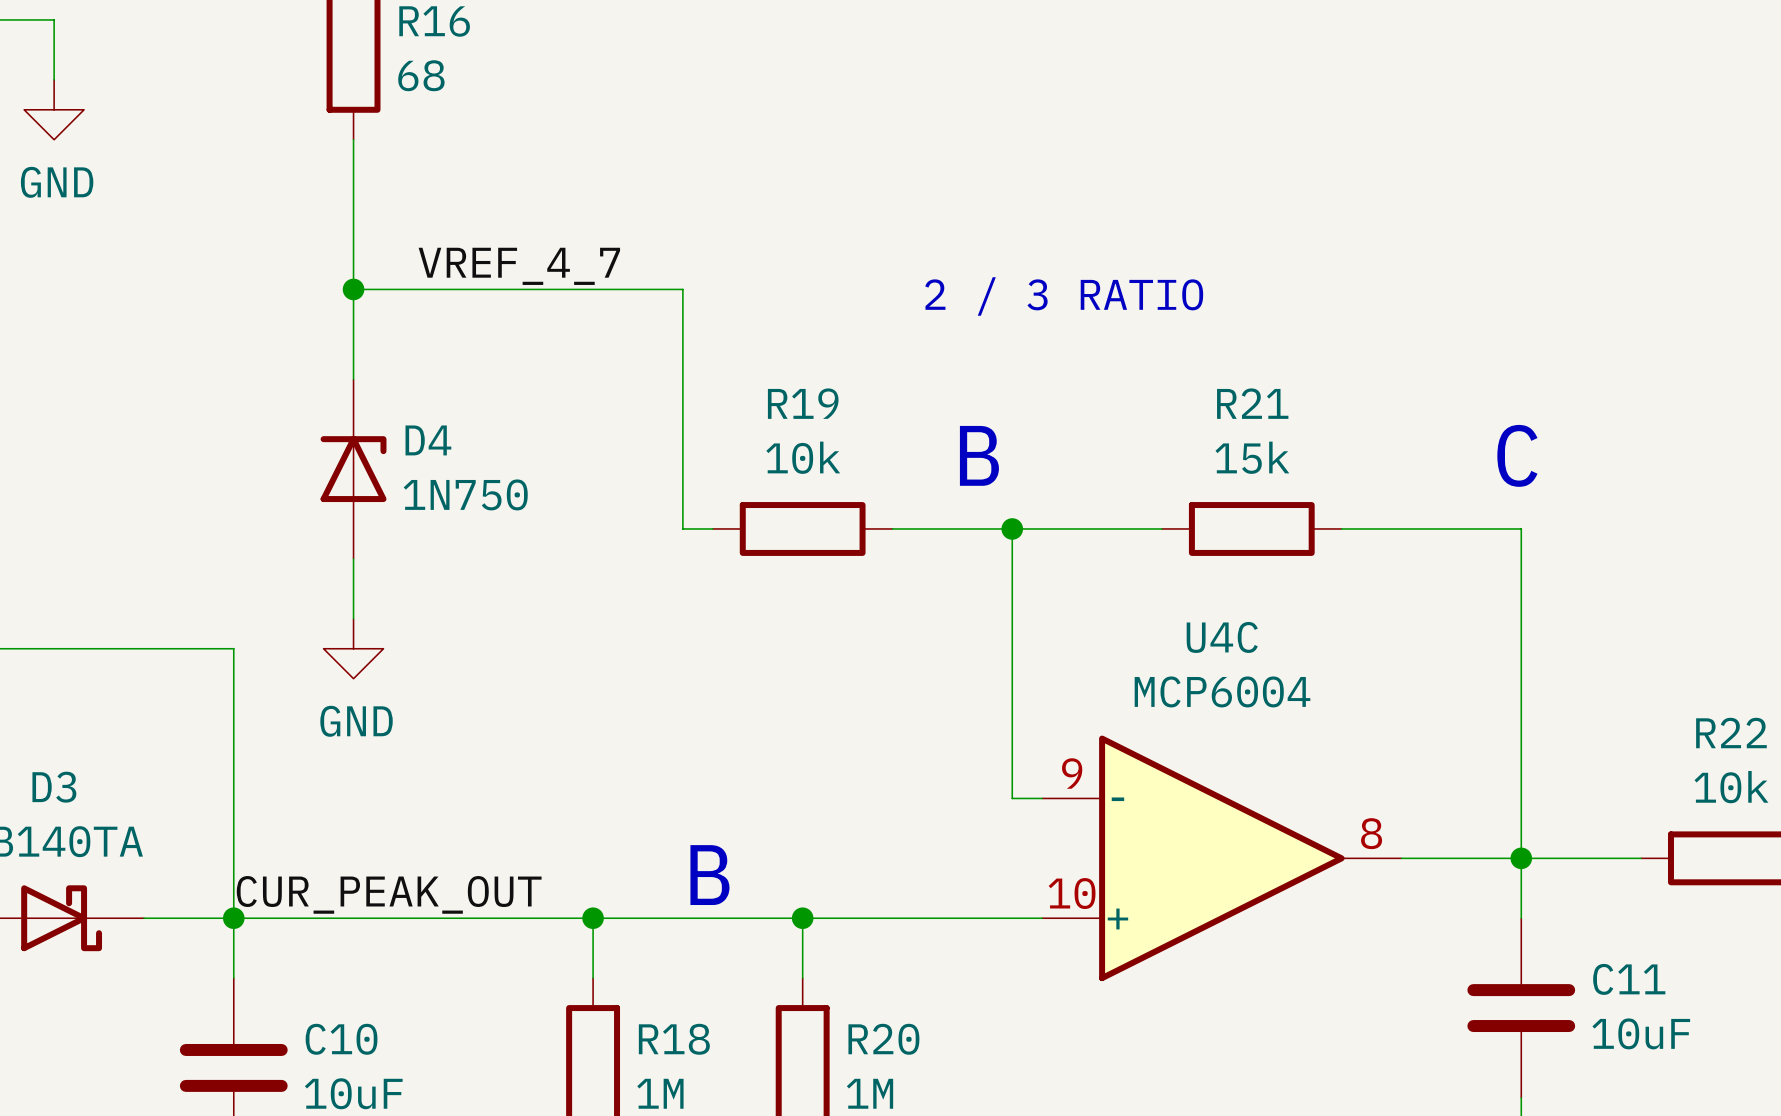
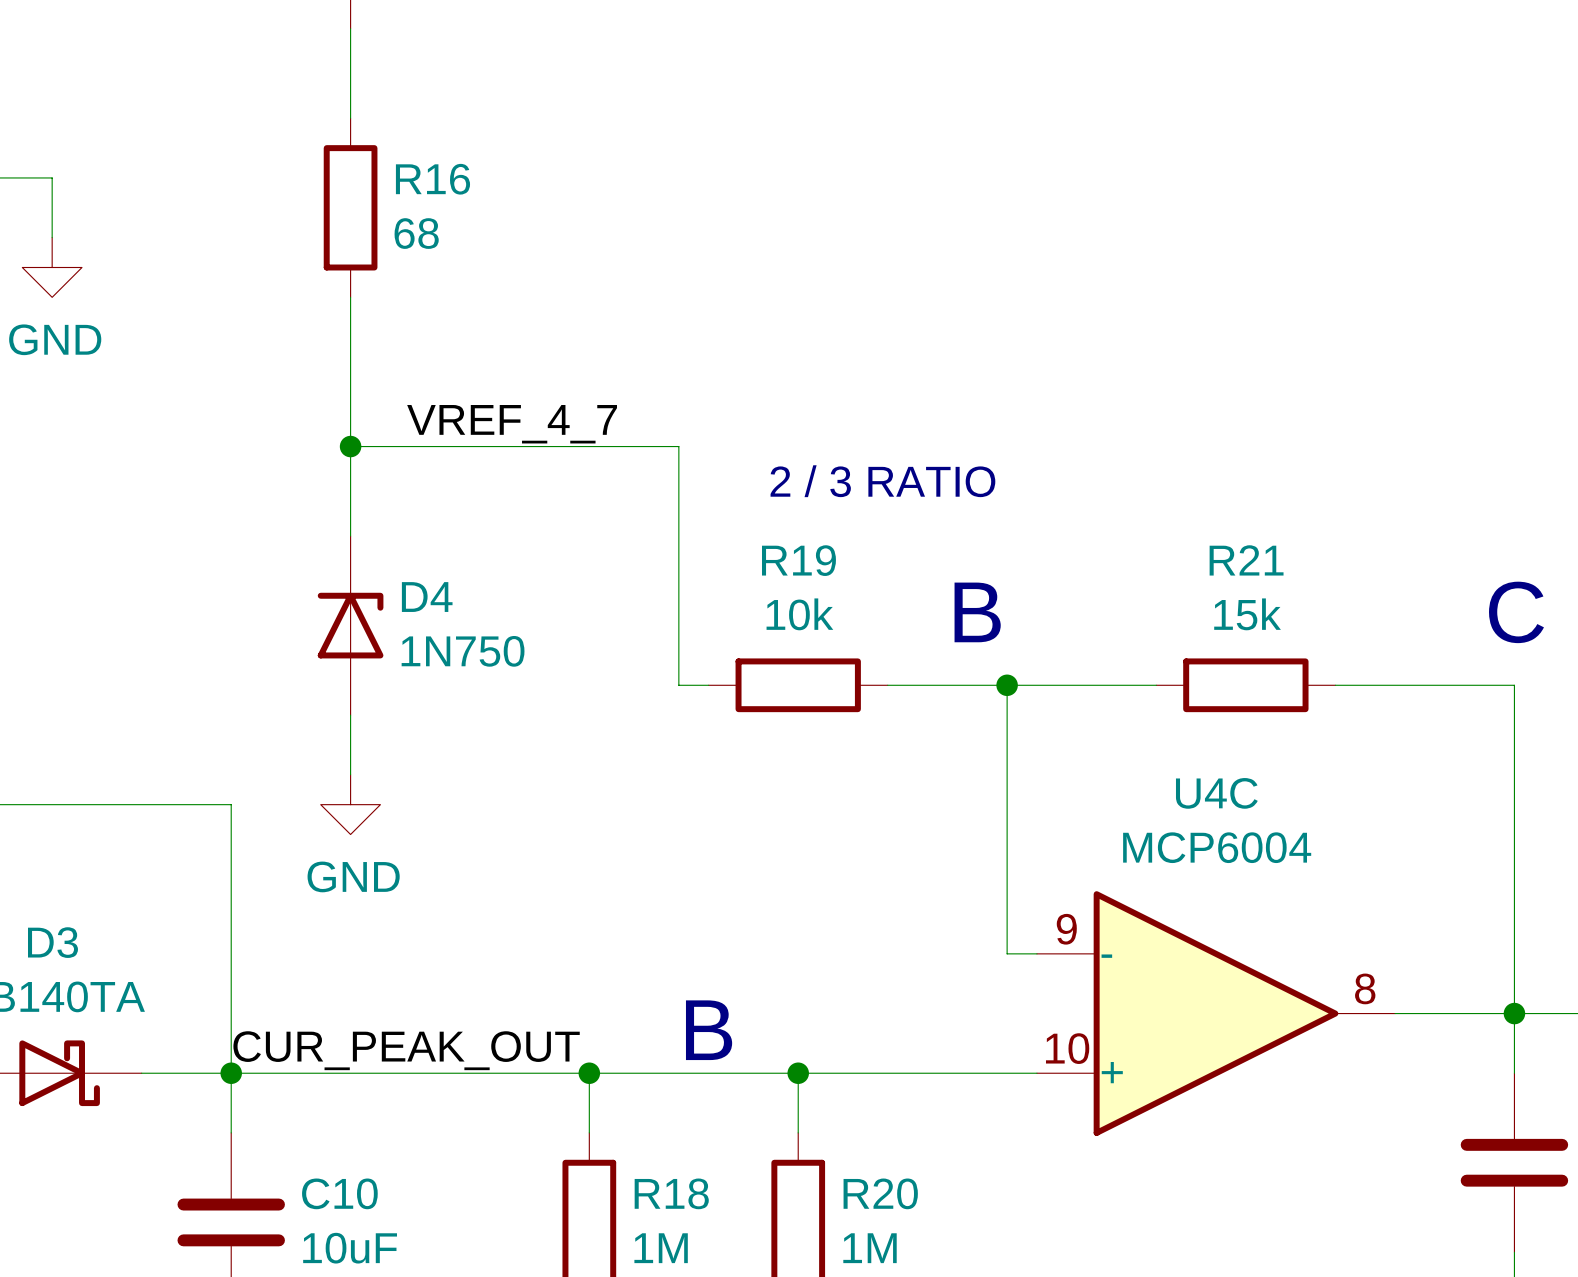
text position: 2 / 3 RATIO (1064, 296) -> 2 / 3 RATIO (882, 481)

